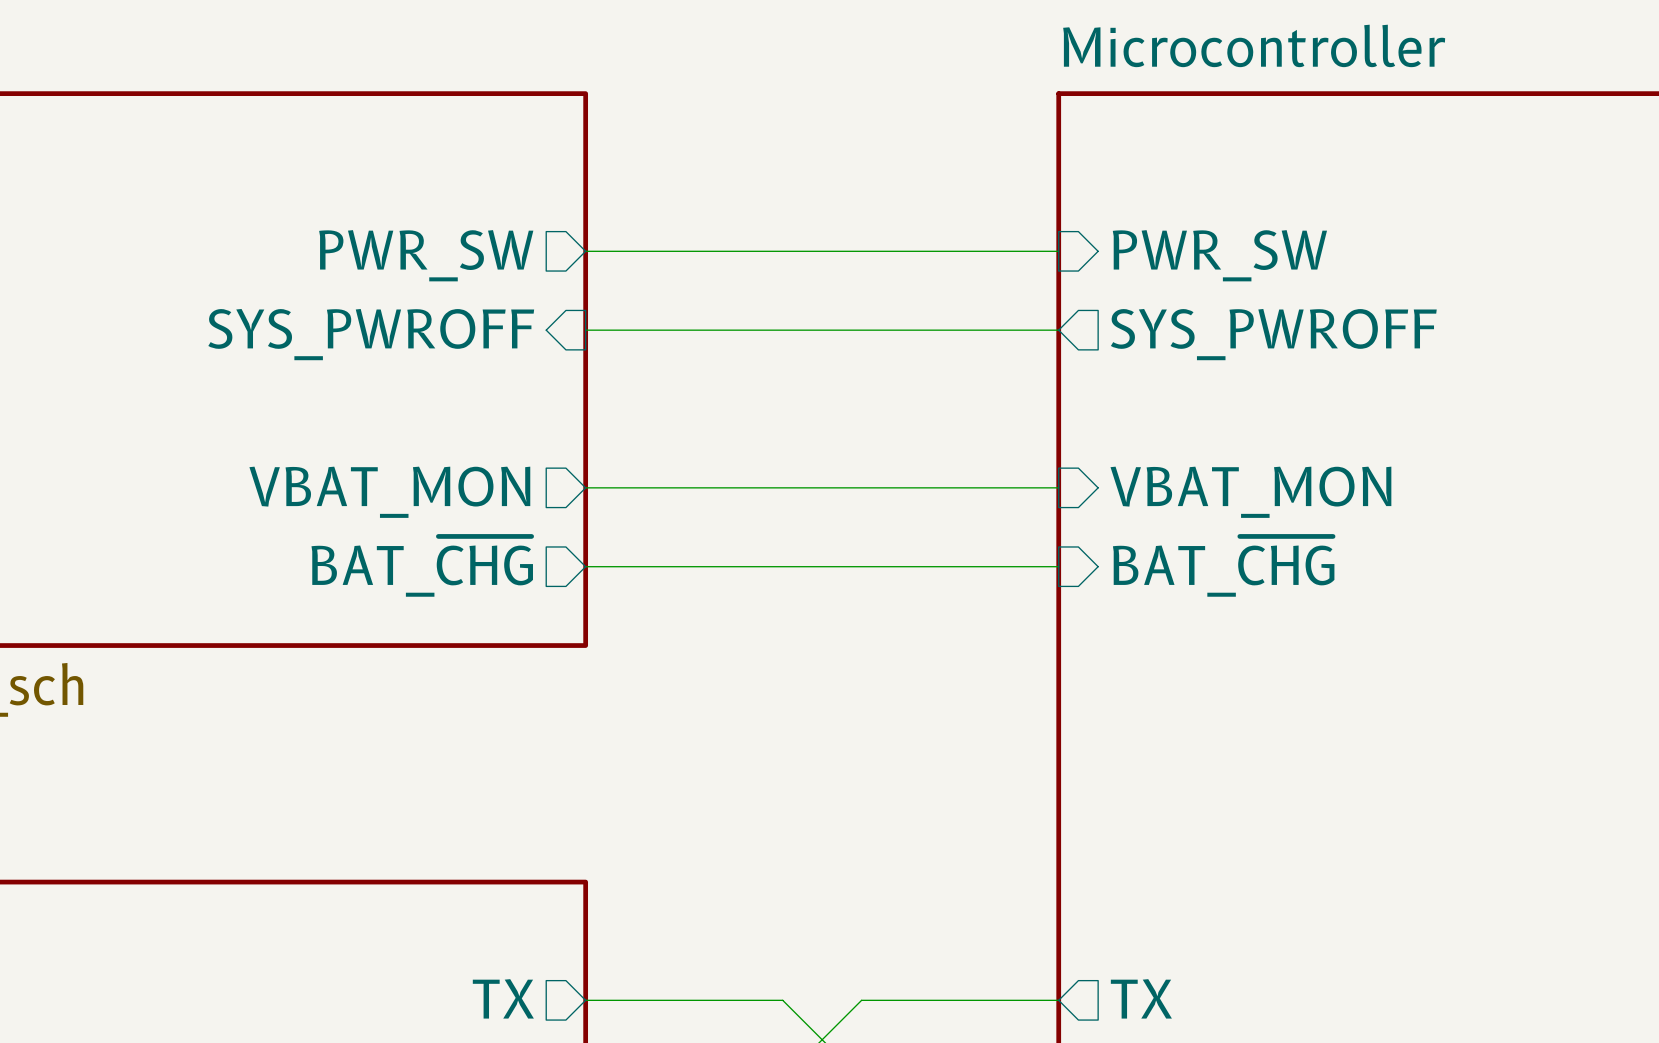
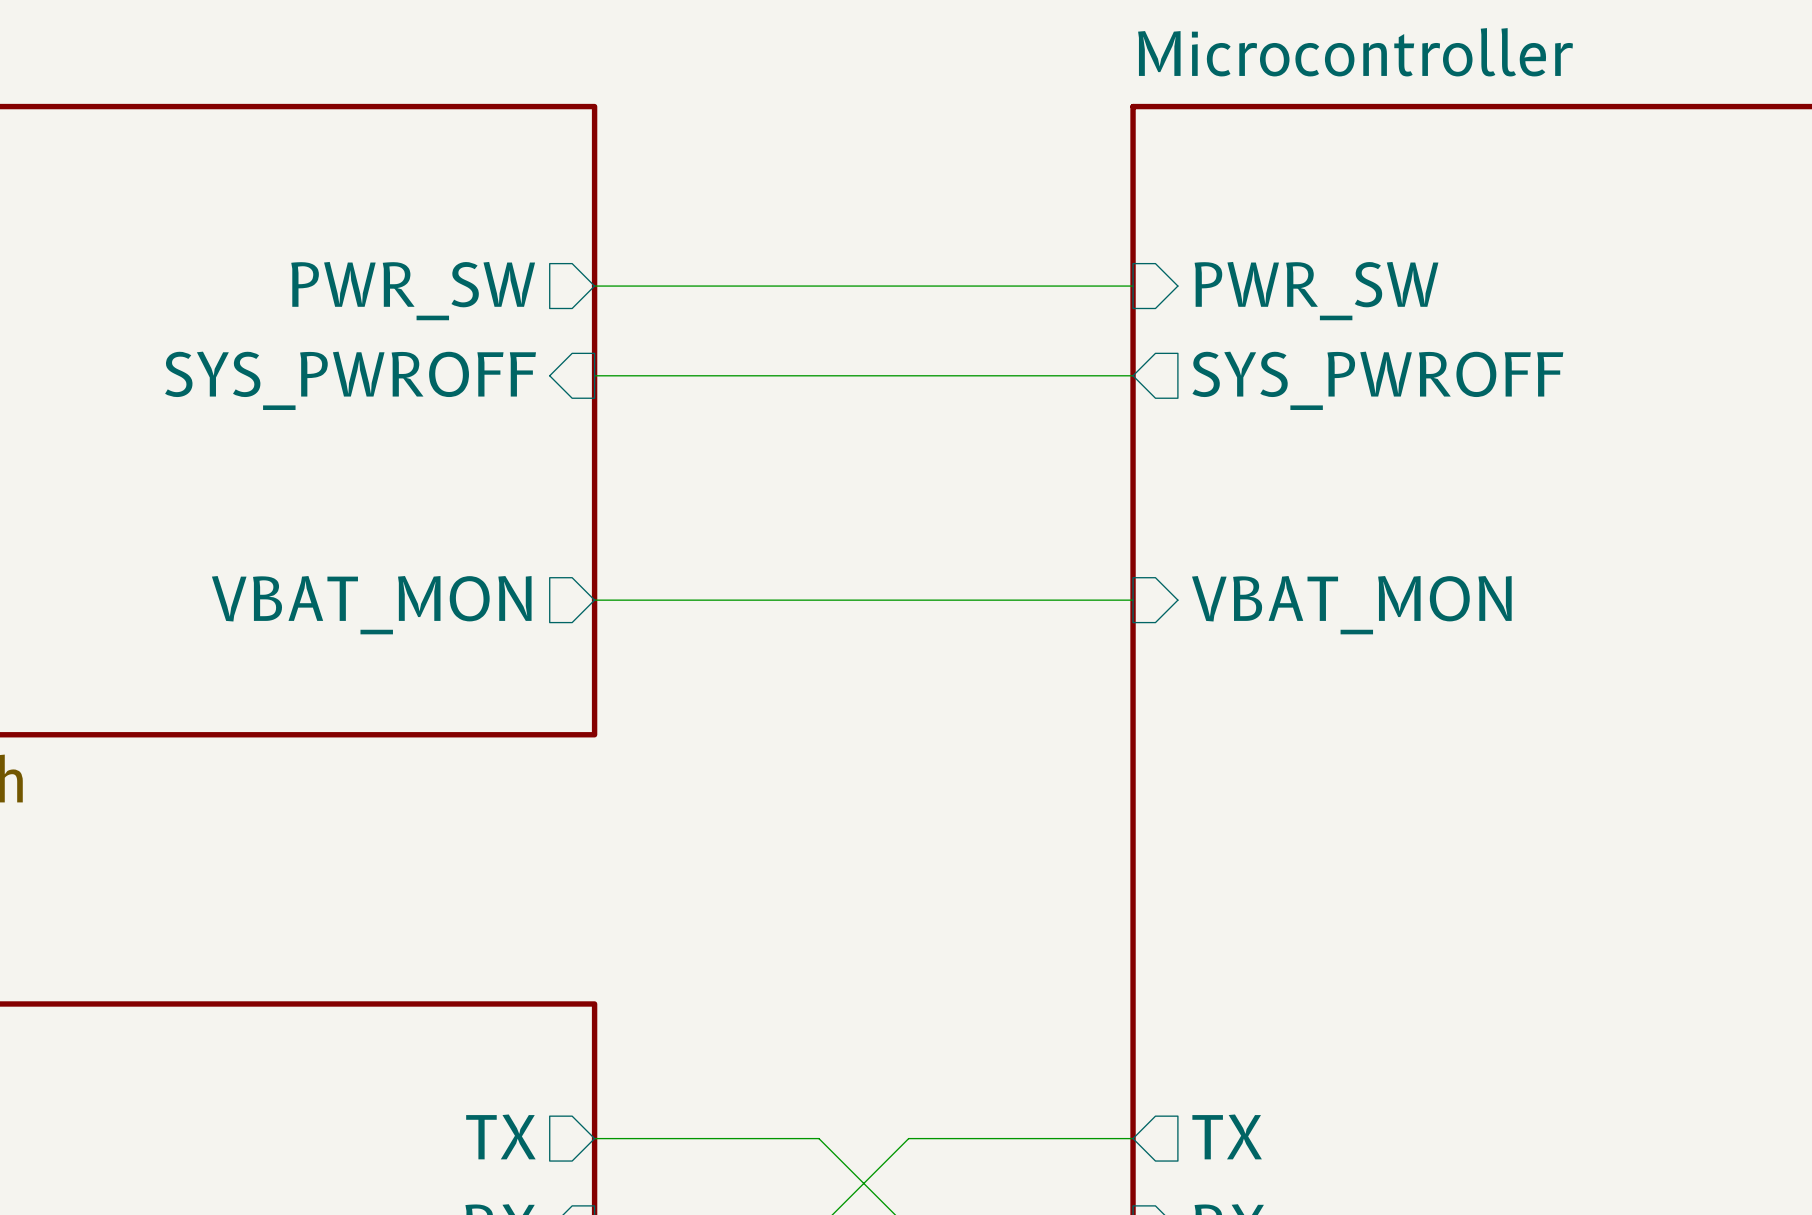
wire: (585, 487) (1058, 487) -> none
sheet pin position: VBAT_MON (389, 492) -> VBAT_MON (371, 605)
sheet pin position: VBAT_MON (1250, 492) -> VBAT_MON (1351, 605)
sheet pin: BAT_~{CHG} (422, 566) -> none
wire: (585, 566) (1058, 566) -> (594, 600) (1133, 600)
sheet pin: BAT_~{CHG} (1223, 566) -> none

